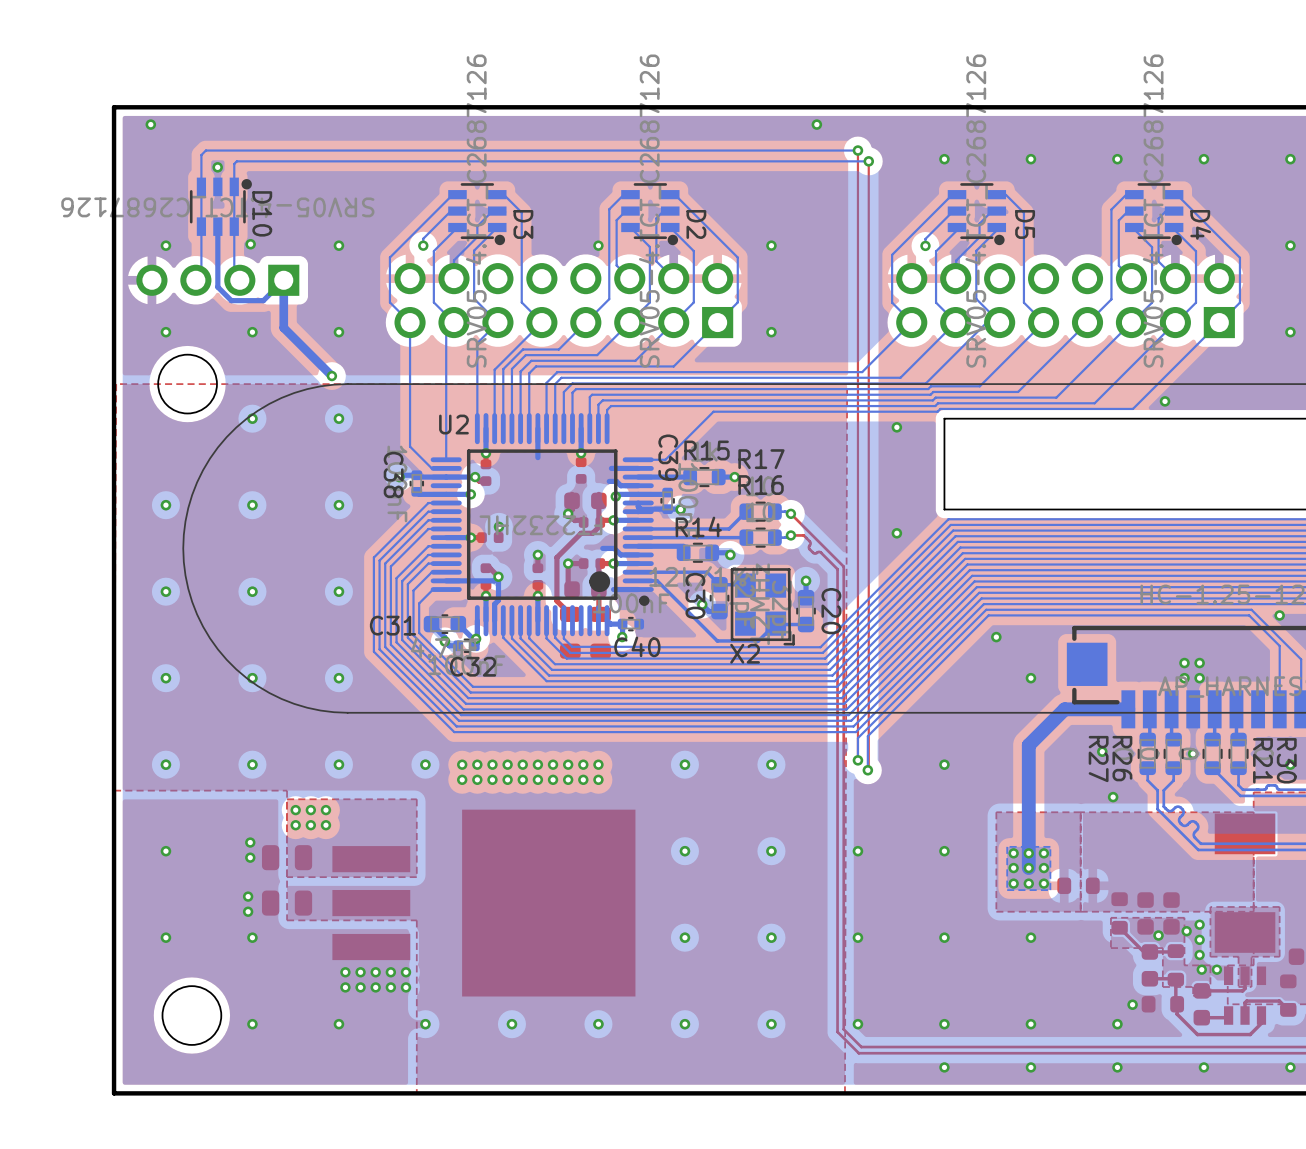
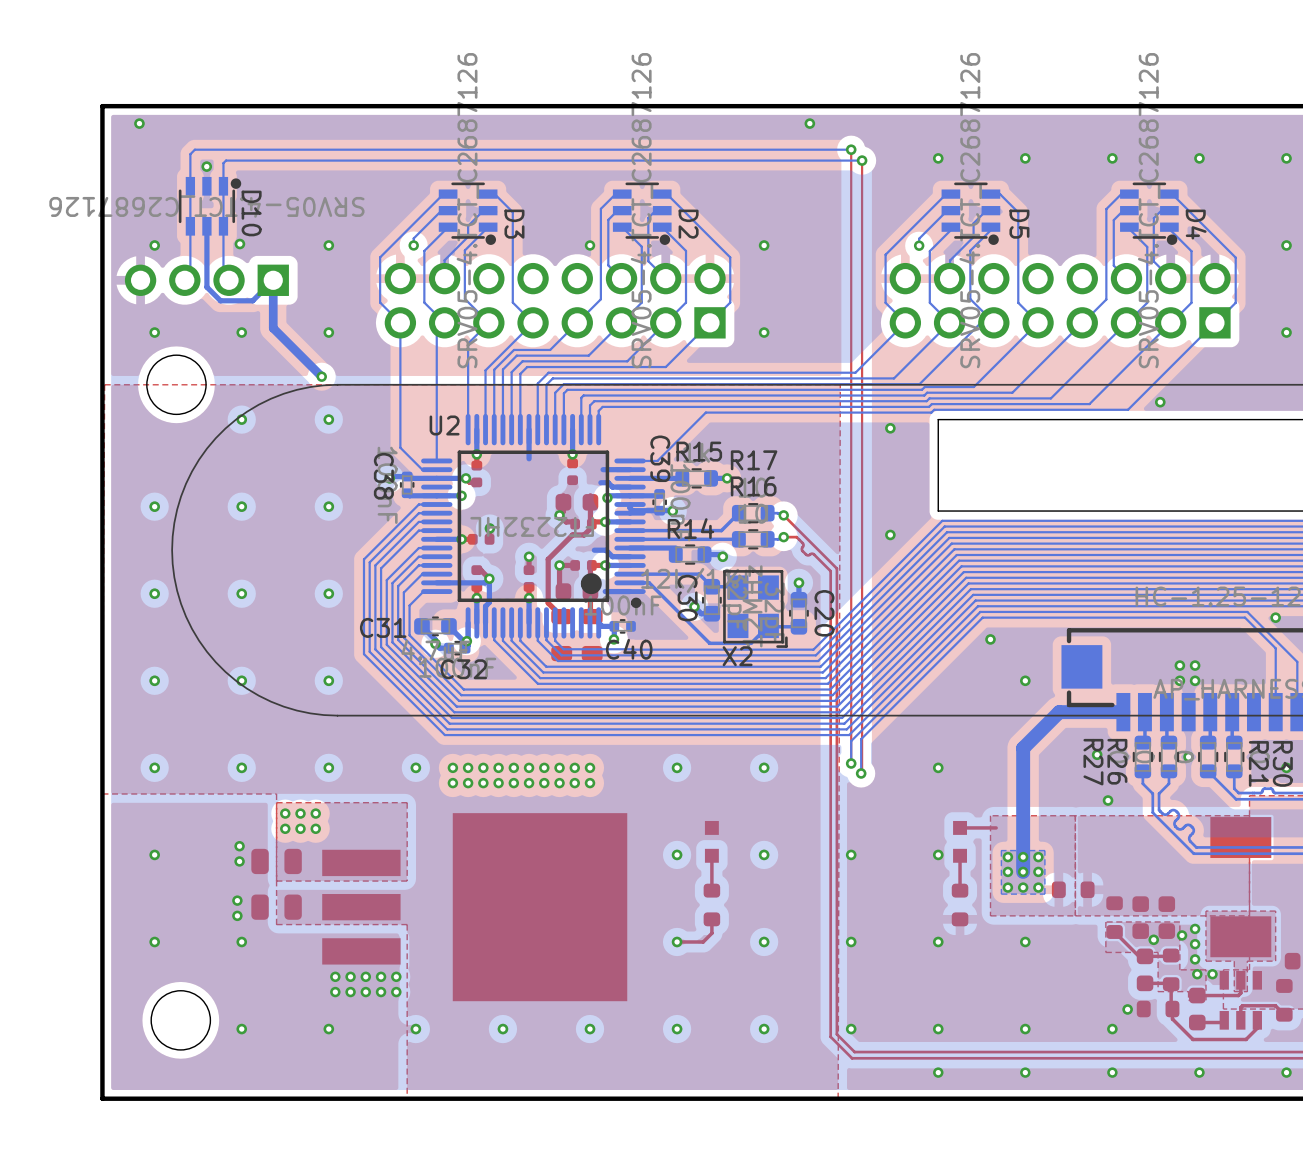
top track: none -> (996, 827) (960, 827)
part: none -> (711, 841)
part: none -> (960, 841)
top track: none -> (711, 855) (711, 890)
top track: none -> (960, 855) (960, 890)
part: none -> (711, 904)
part: none -> (960, 904)
top track: none -> (711, 919) (711, 933) (703, 941) (677, 941)

